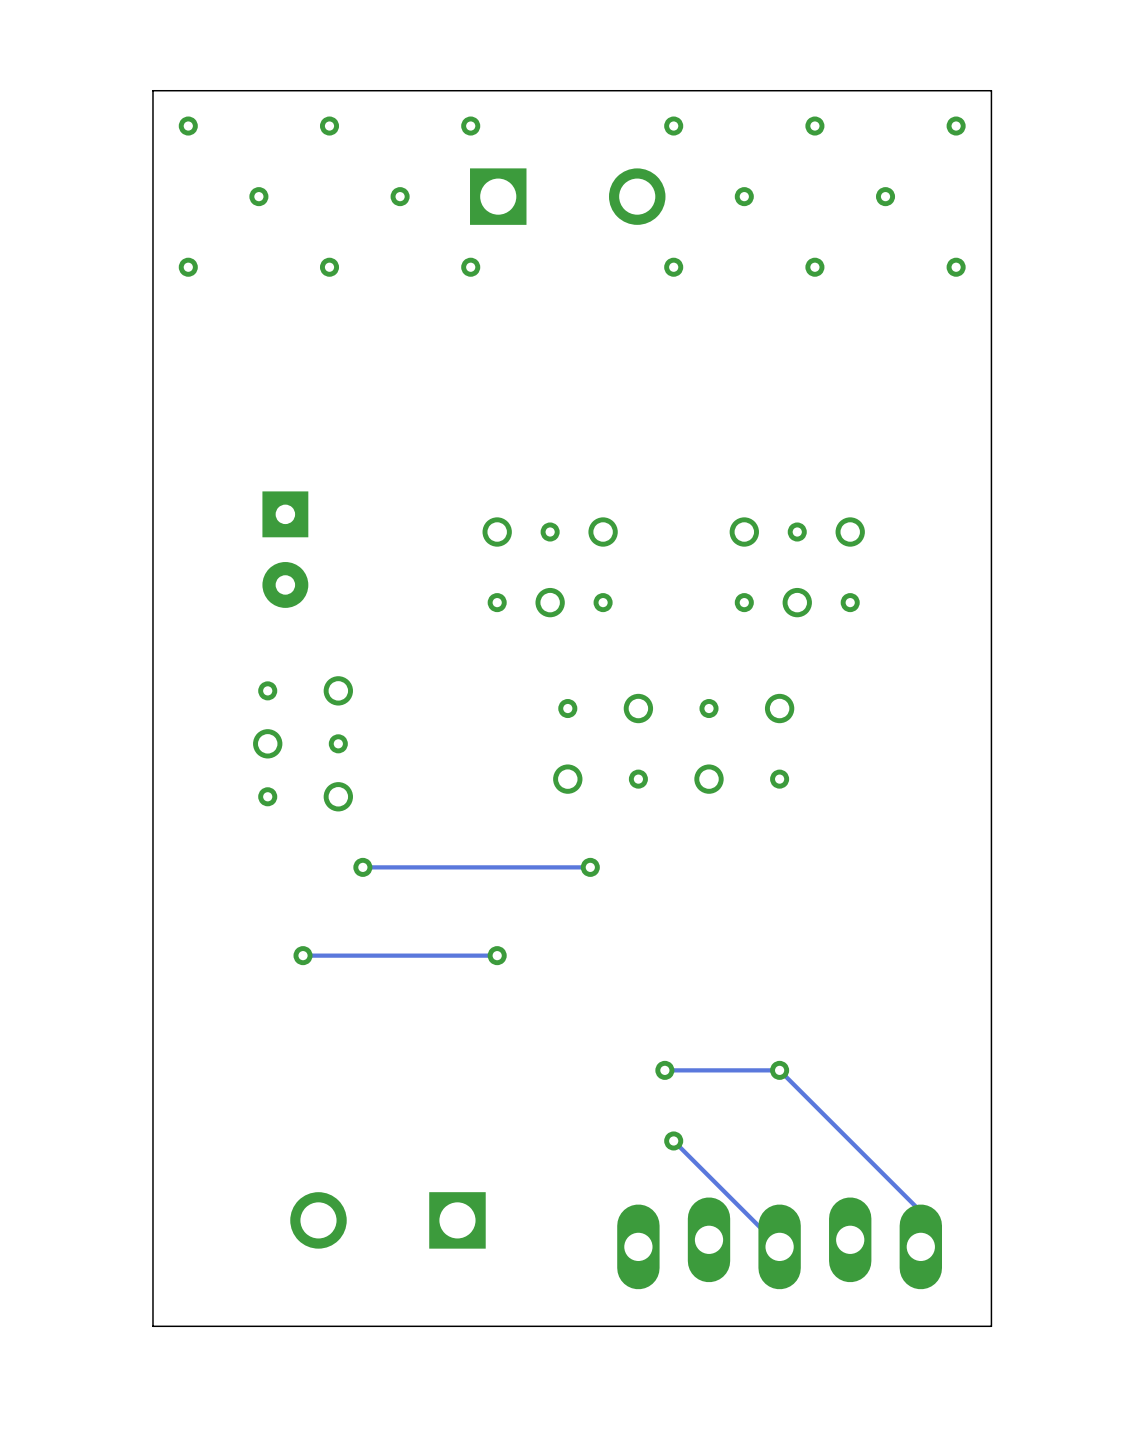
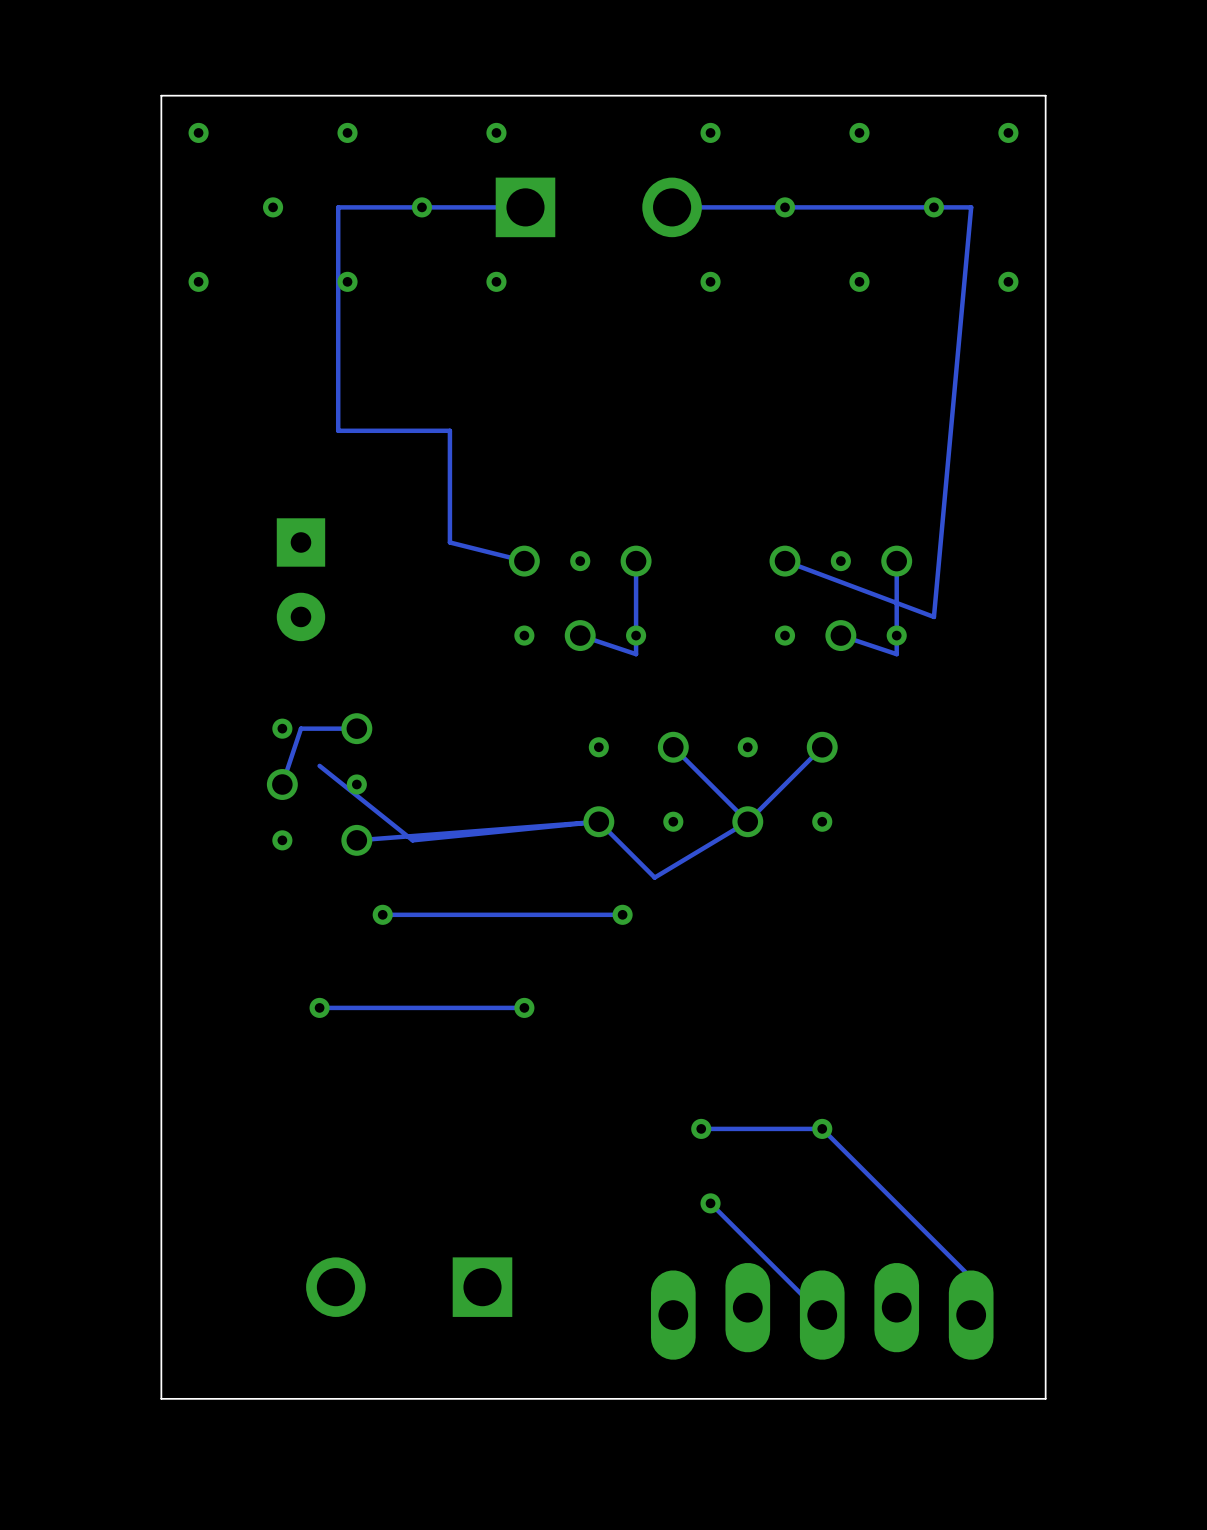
track: none -> (525, 207) (338, 207) (338, 430) (449, 430) (449, 542) (524, 561)
track: none -> (672, 207) (971, 207) (933, 616) (785, 561)
track: none -> (636, 561) (636, 654) (580, 635)
track: none -> (896, 561) (896, 654) (840, 635)
track: none -> (356, 728) (300, 728) (282, 784)
track: none -> (673, 747) (747, 821)
track: none -> (822, 747) (747, 821)
track: none -> (319, 765) (412, 840) (598, 821)
track: none -> (598, 821) (356, 840)
track: none -> (747, 821) (654, 877) (598, 821)

